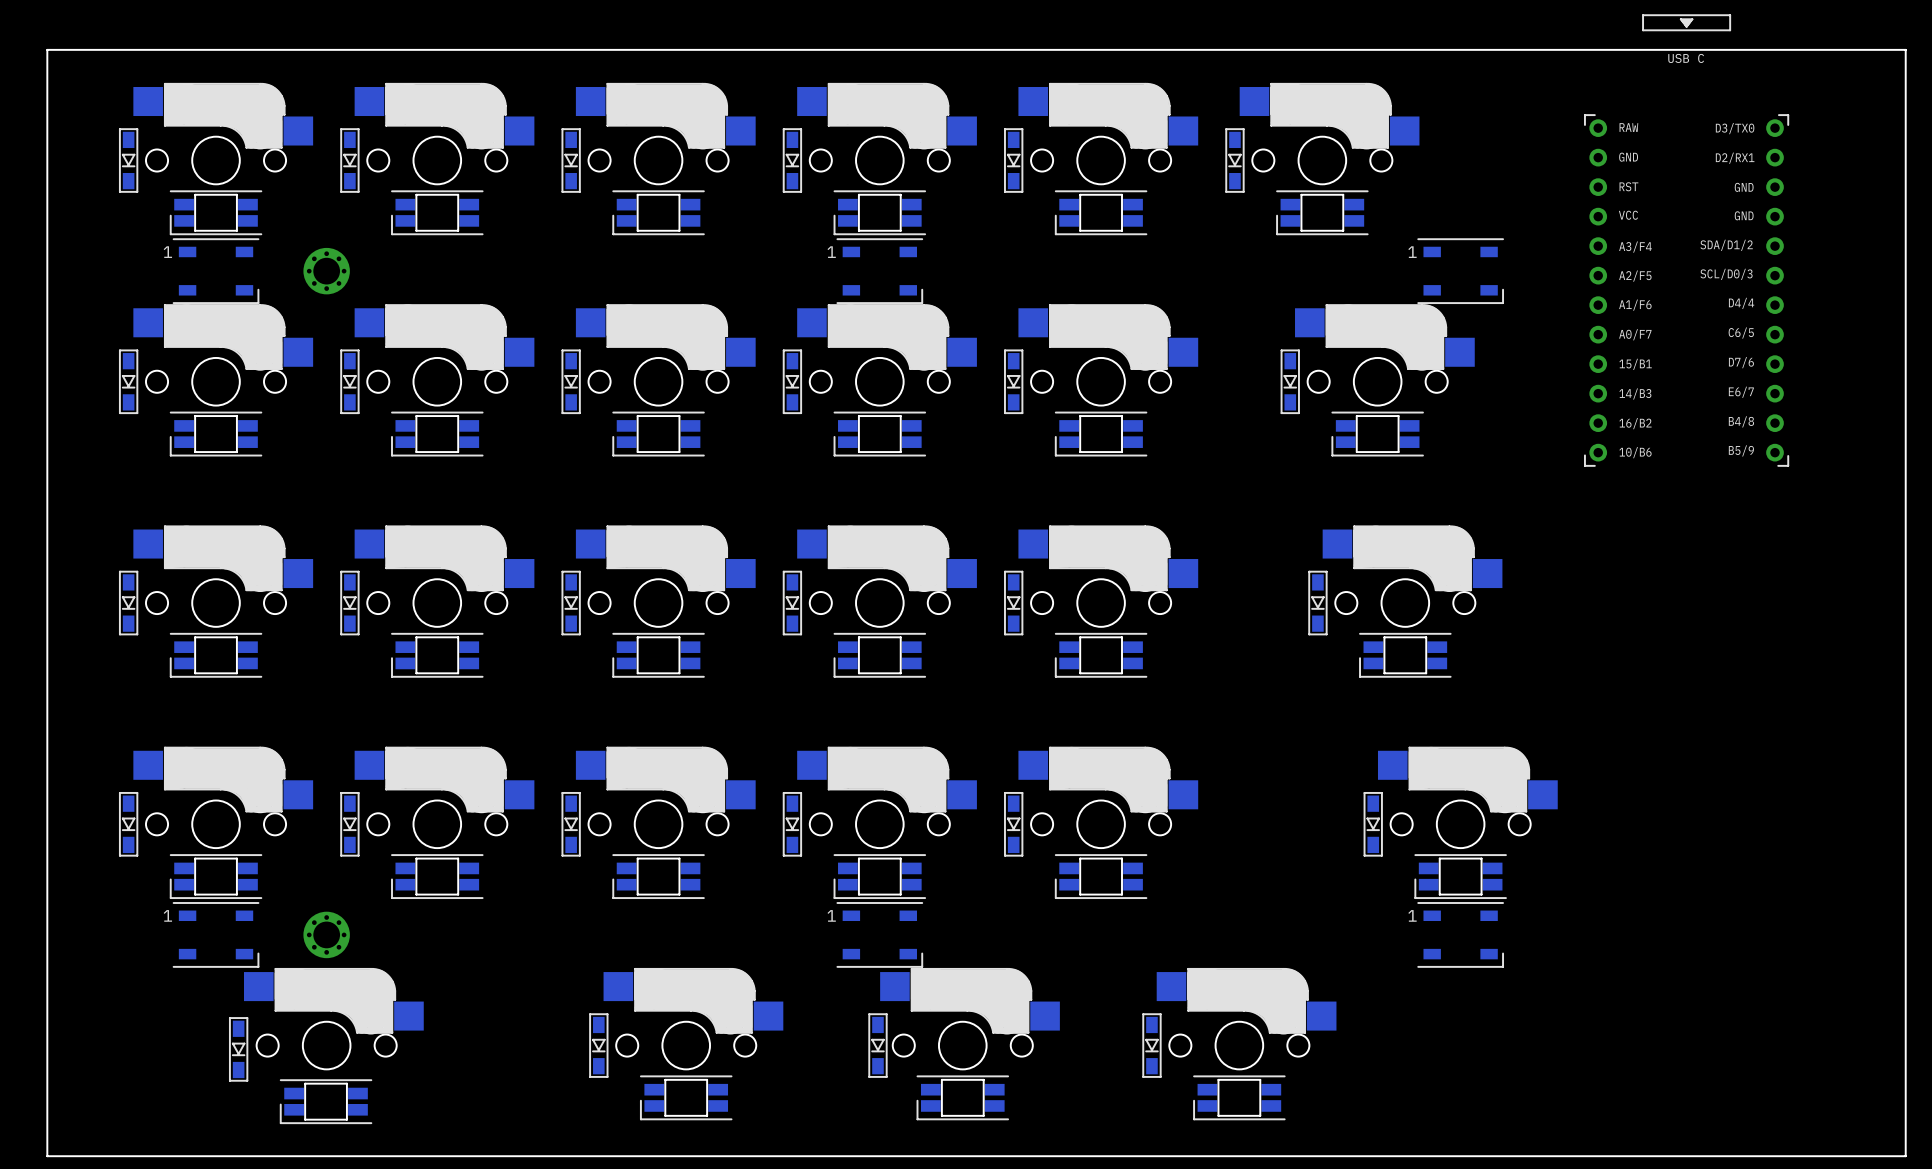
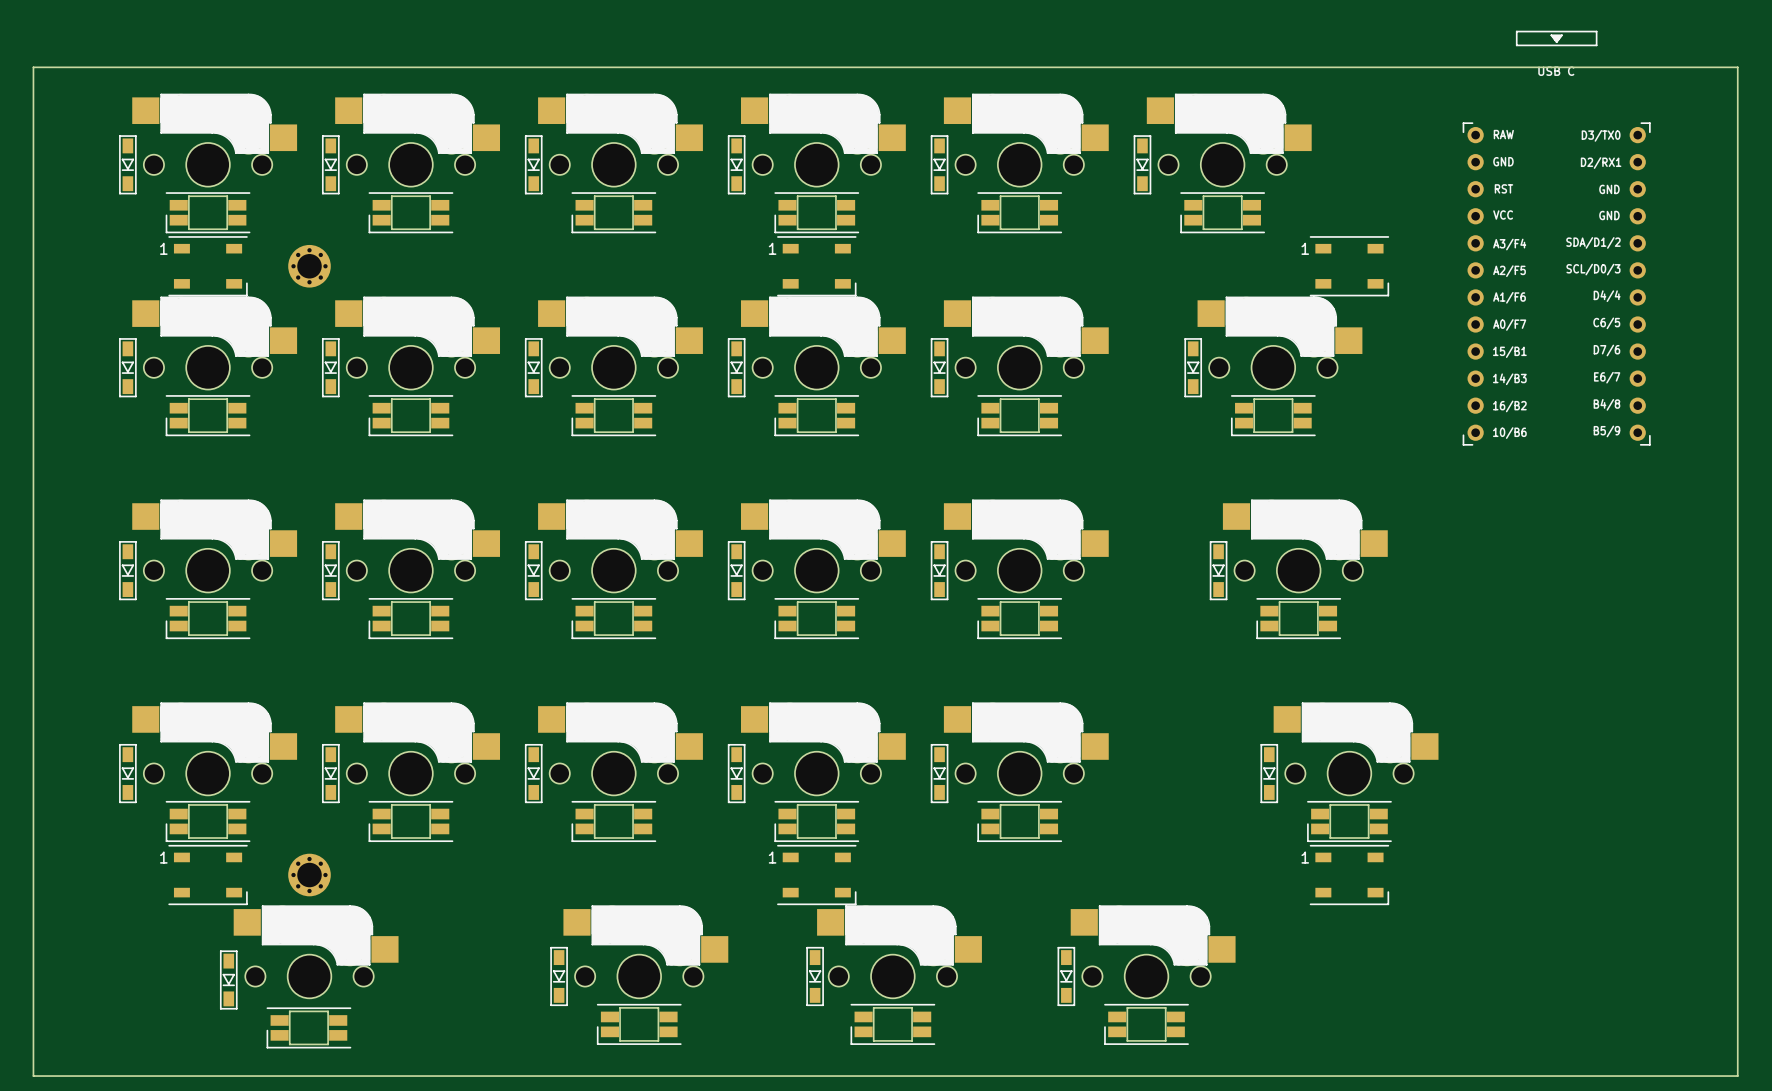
board edge: (1905, 49) (47, 49) (47, 1156) (1905, 1156) (1905, 49) -> (1737, 67) (1737, 1076) (33, 1076) (33, 67) (1737, 67)

